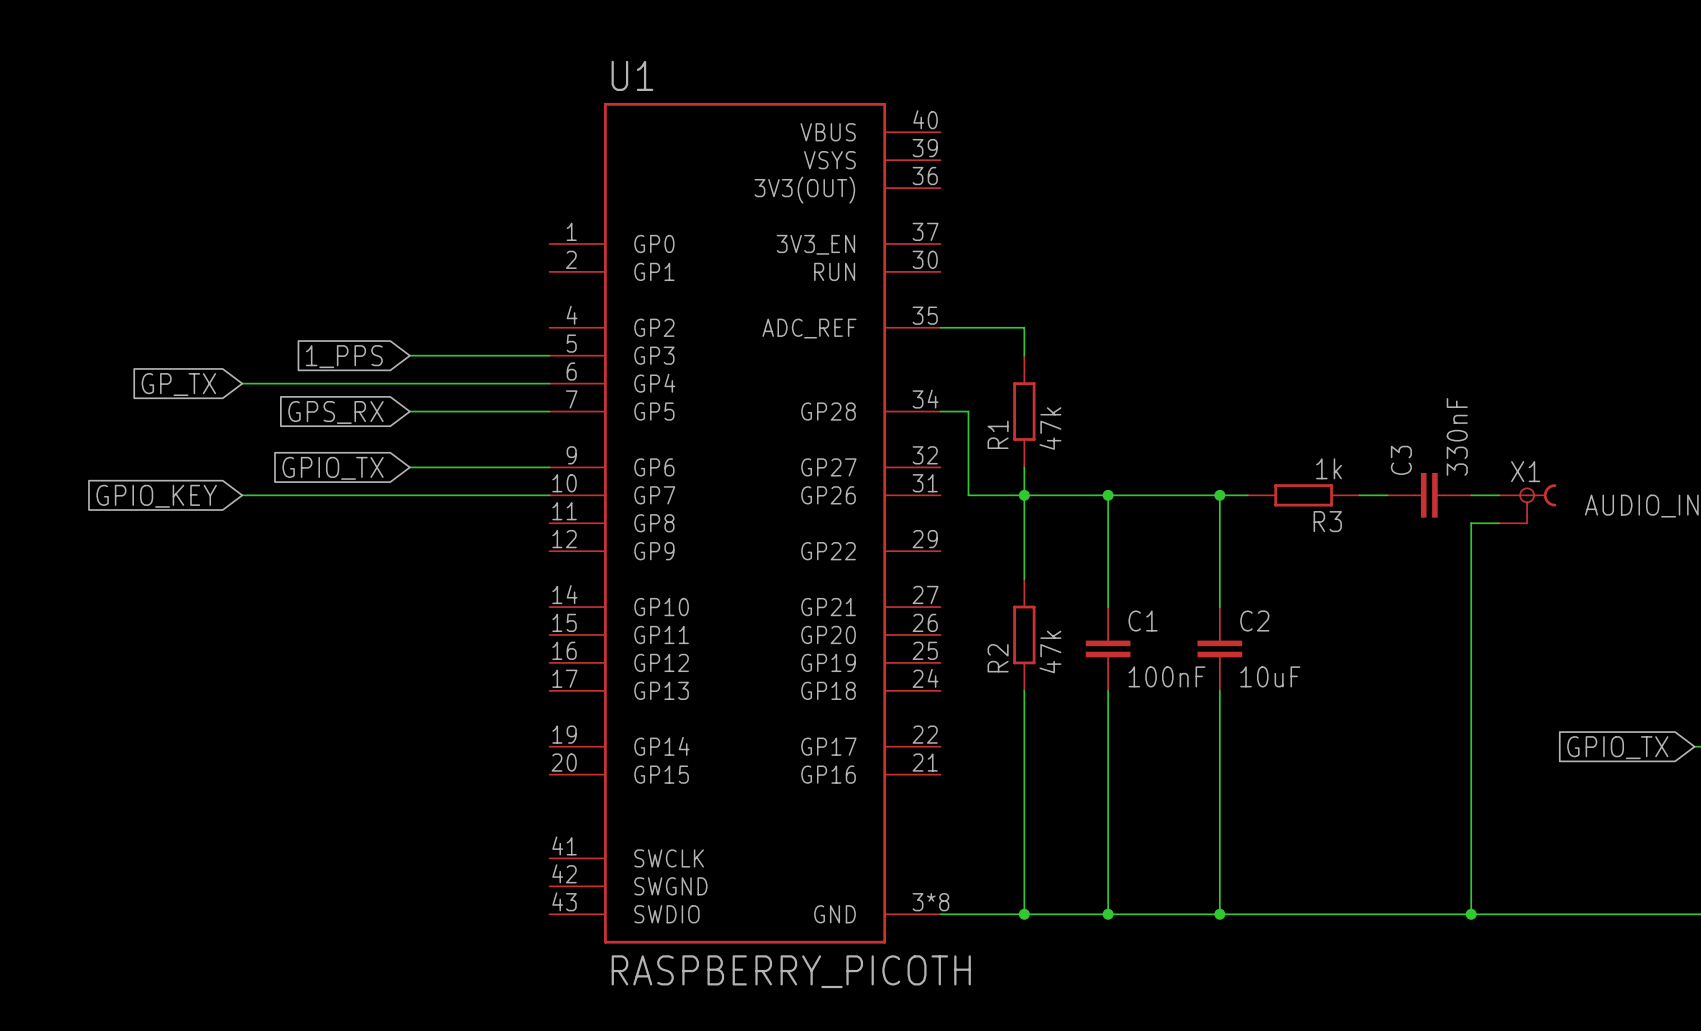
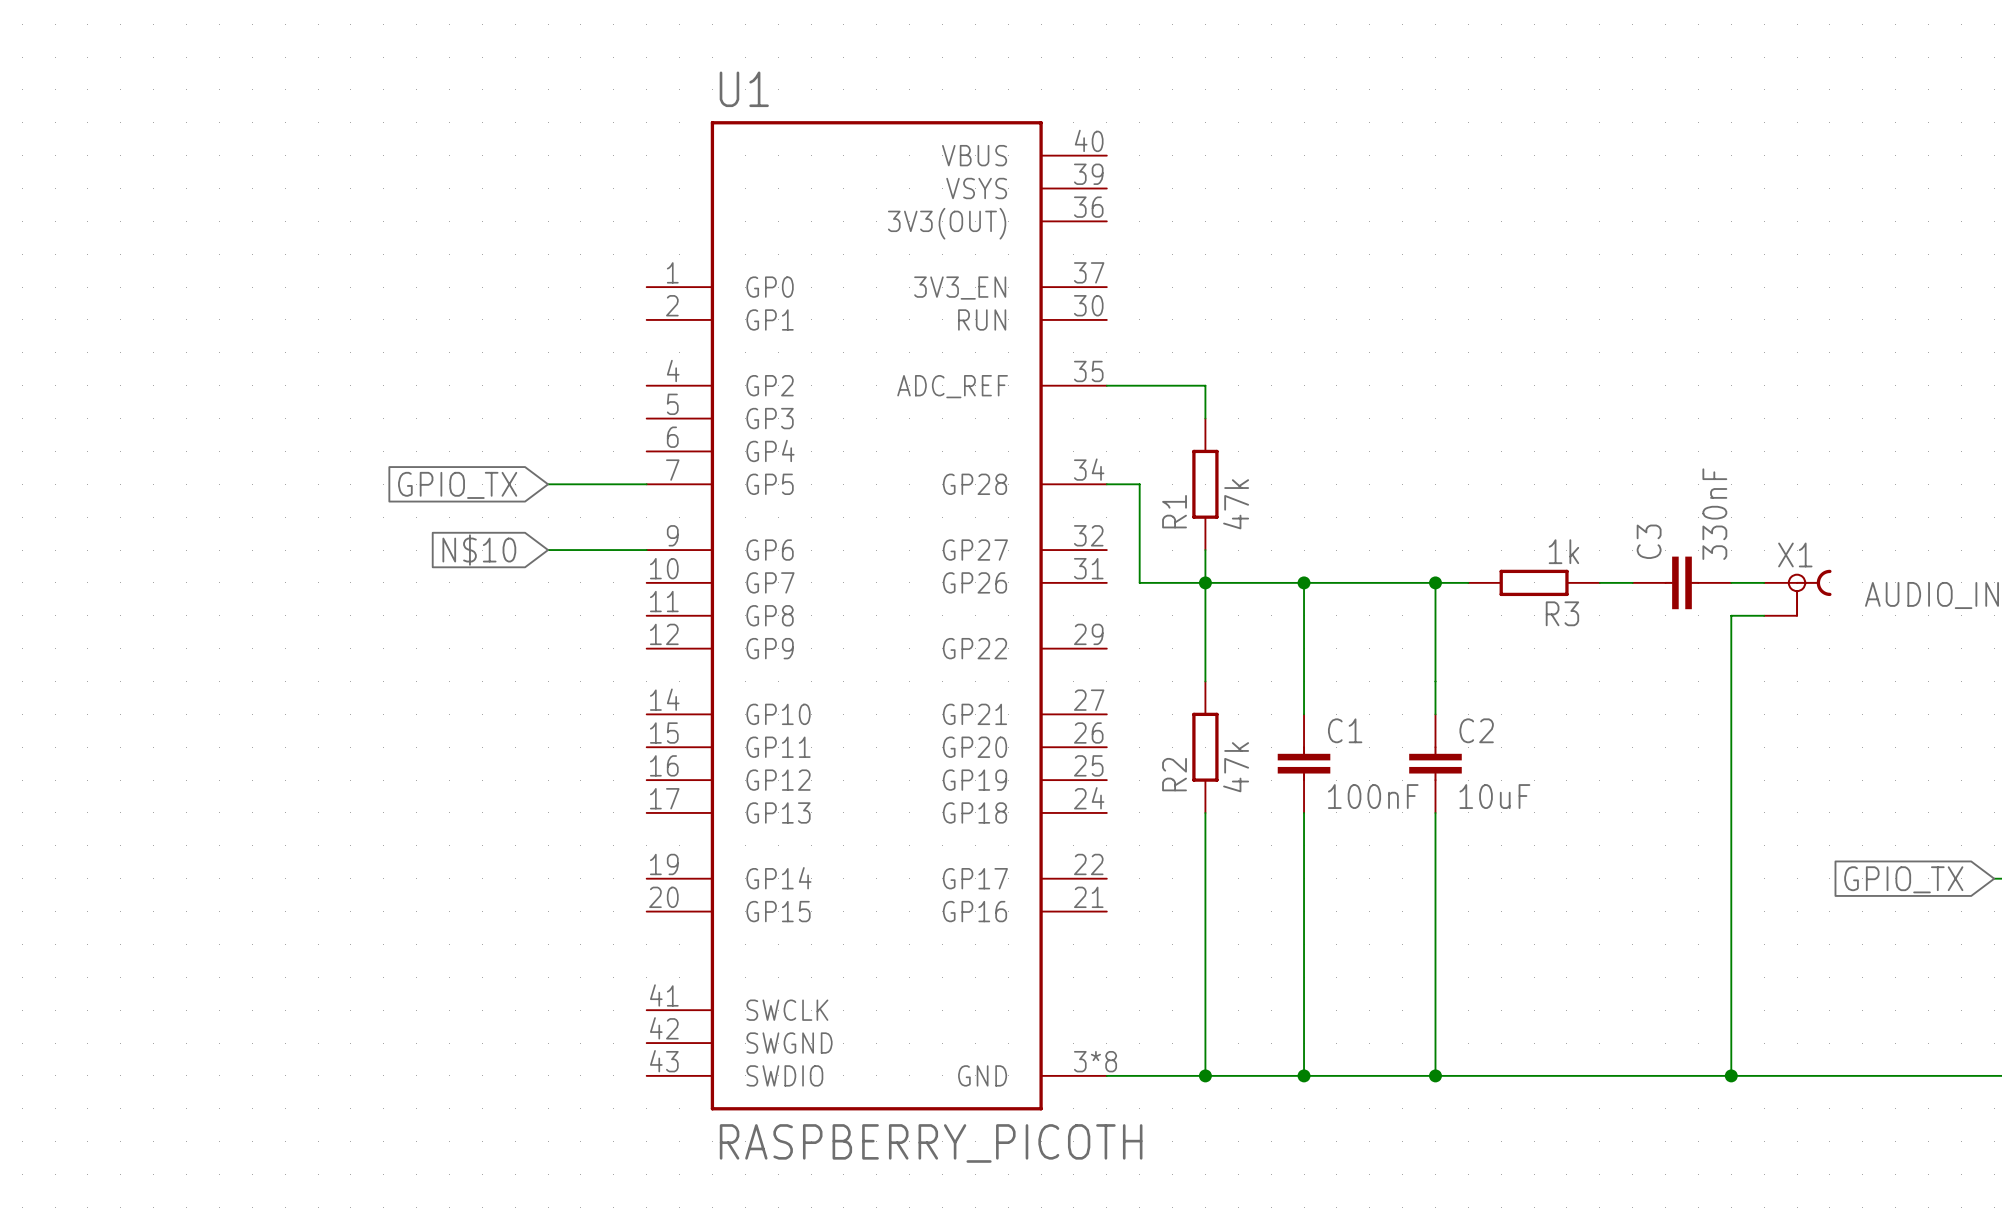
wire: (409, 355) (549, 355) -> none
global label: 1_PPS (344, 356) -> none
wire: (242, 383) (549, 383) -> none
global label: GP_TX (178, 384) -> none
wire: (409, 411) (465, 411) -> none
global label: GPS_RX (335, 412) -> none
global label: none -> N$10 (479, 550)
wire: (409, 467) (465, 467) -> none
global label position: GPIO_TX (333, 468) -> GPIO_TX (457, 485)
wire: (242, 495) (549, 495) -> none
global label: GPIO_KEY (156, 496) -> none

